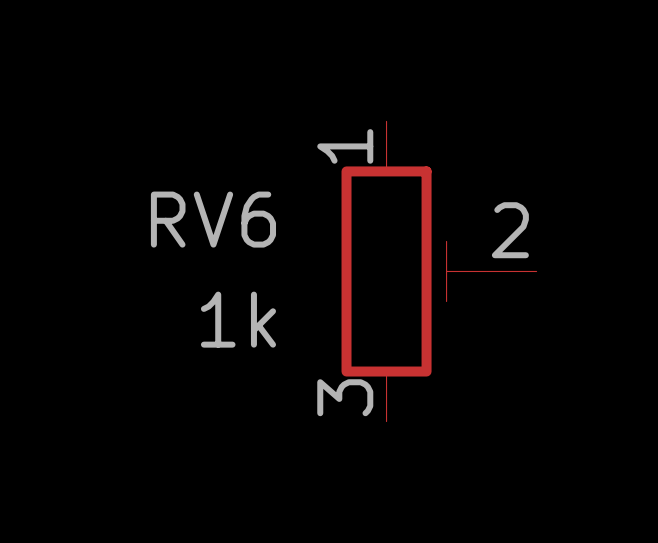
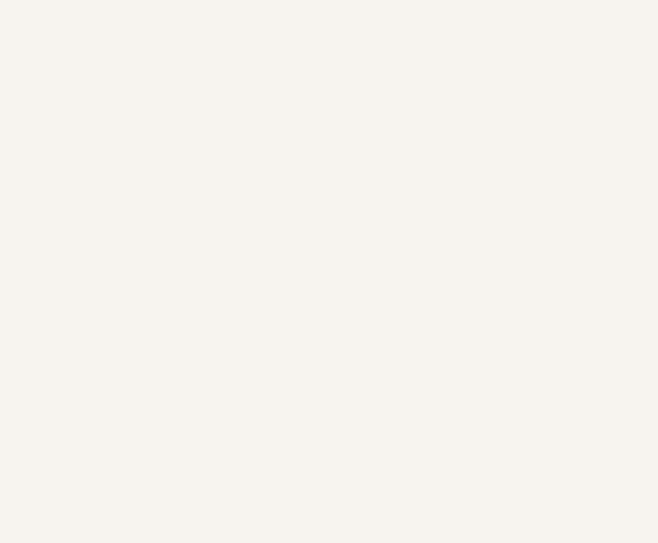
RV6: 1k (439, 271) -> none

